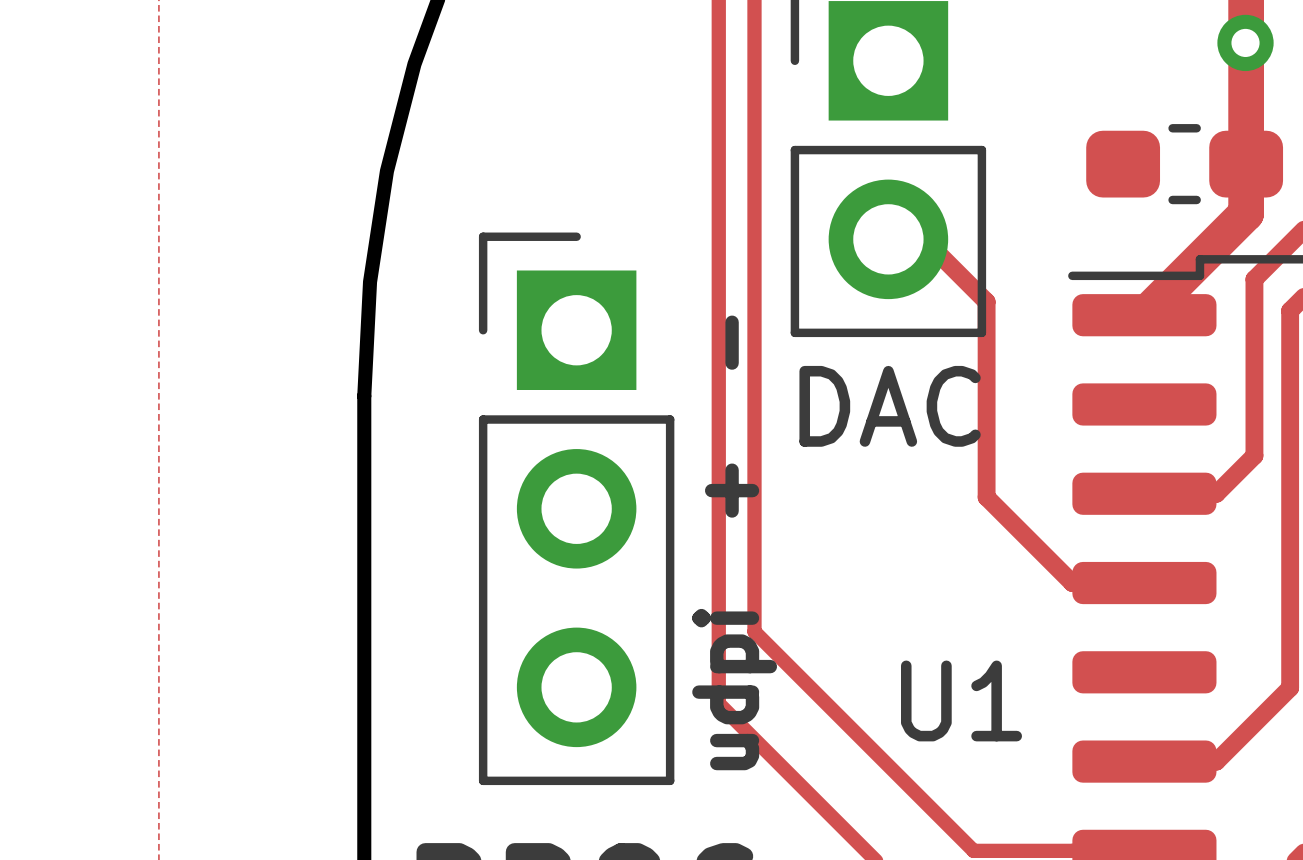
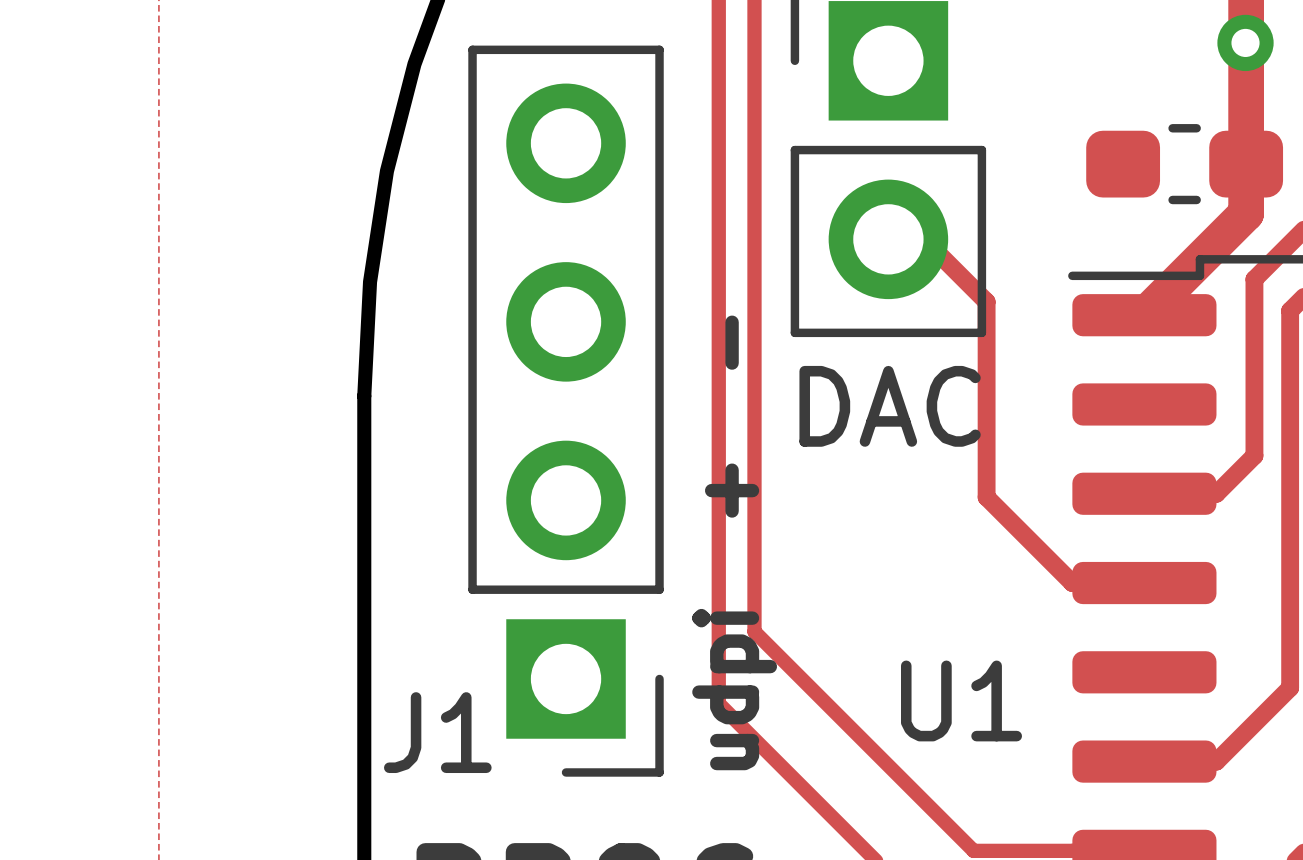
J1: none -> (566, 411)
part: (576, 508) -> none

